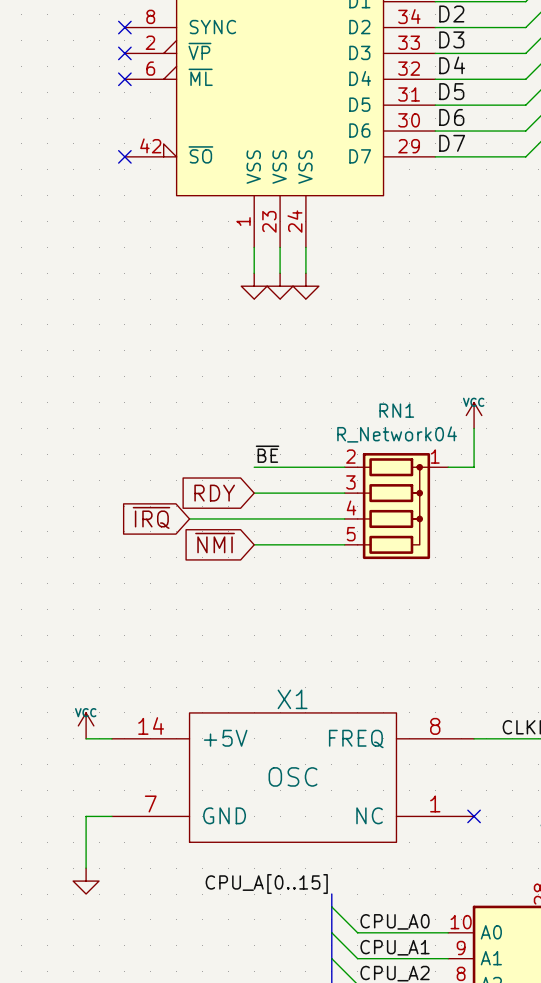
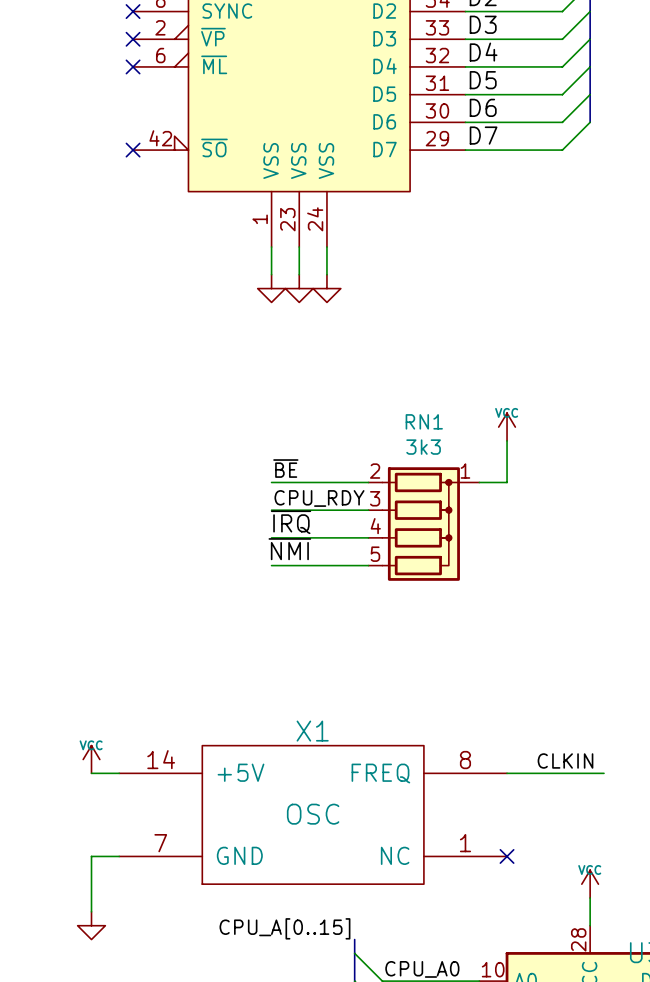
RN1 value: R_Network04 (397, 434) -> 3k3 (423, 447)
label: none -> CPU_RDY (319, 498)
global label: RDY (214, 493) -> none
label: none -> ~{IRQ} (291, 522)
global label: ~{IRQ} (151, 517) -> none
wire: (189, 518) (254, 518) -> none
label: none -> ~{NMI} (289, 549)
global label: ~{NMI} (215, 543) -> none

